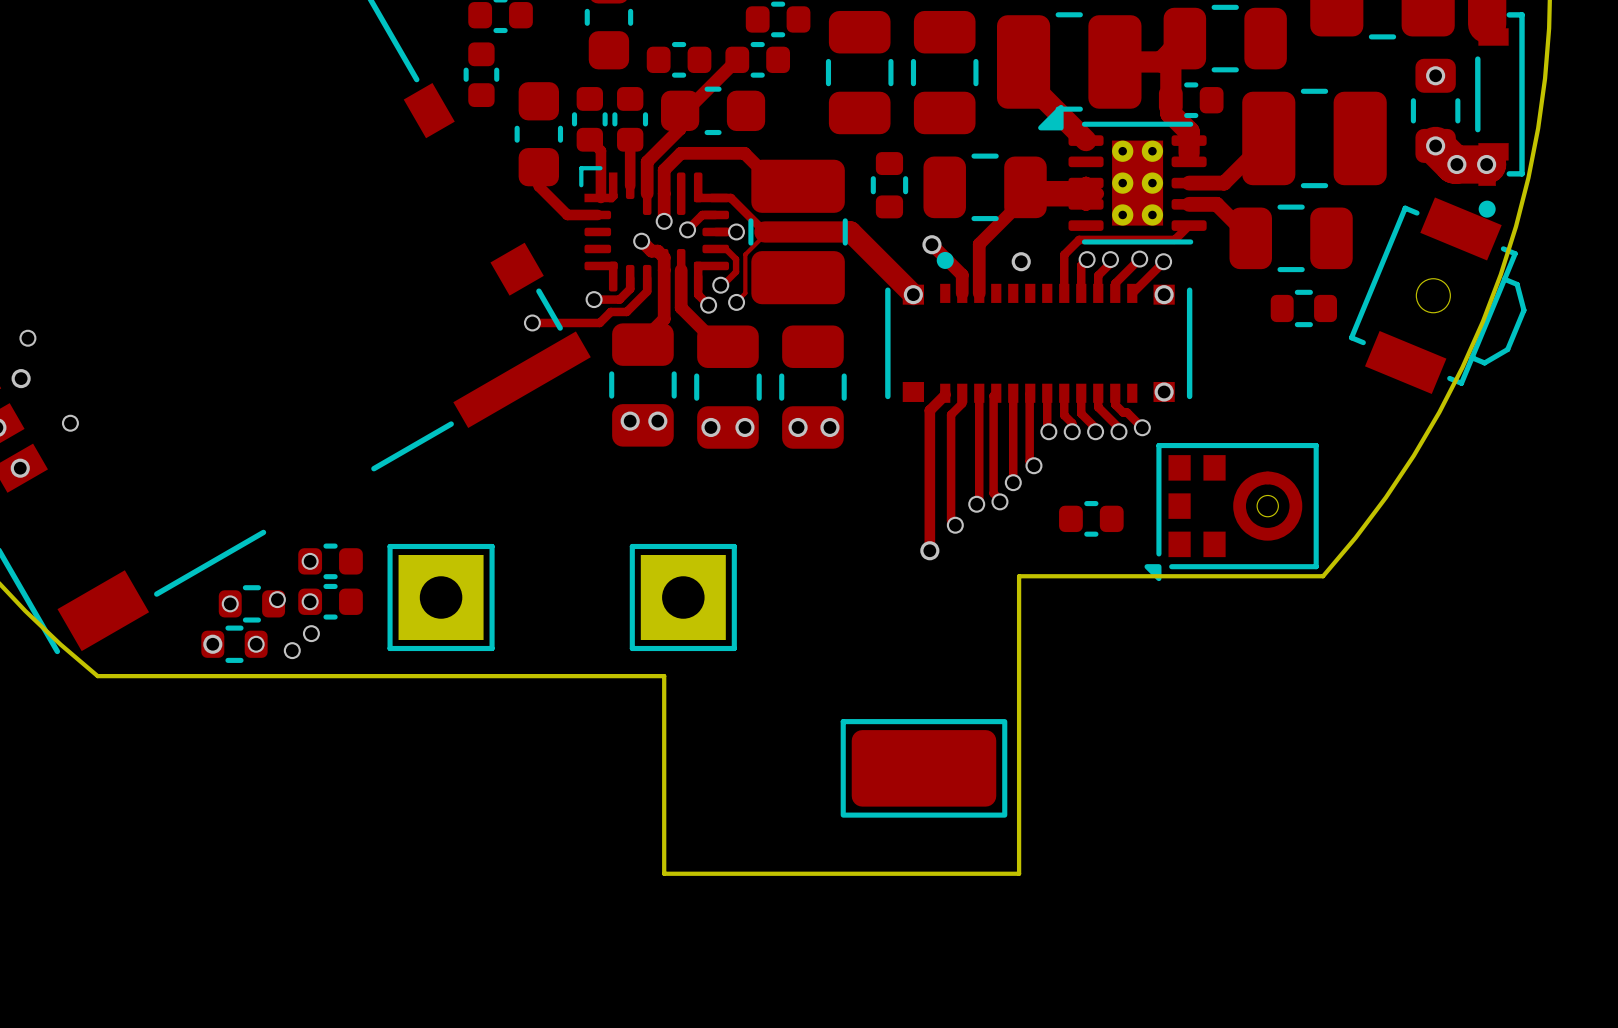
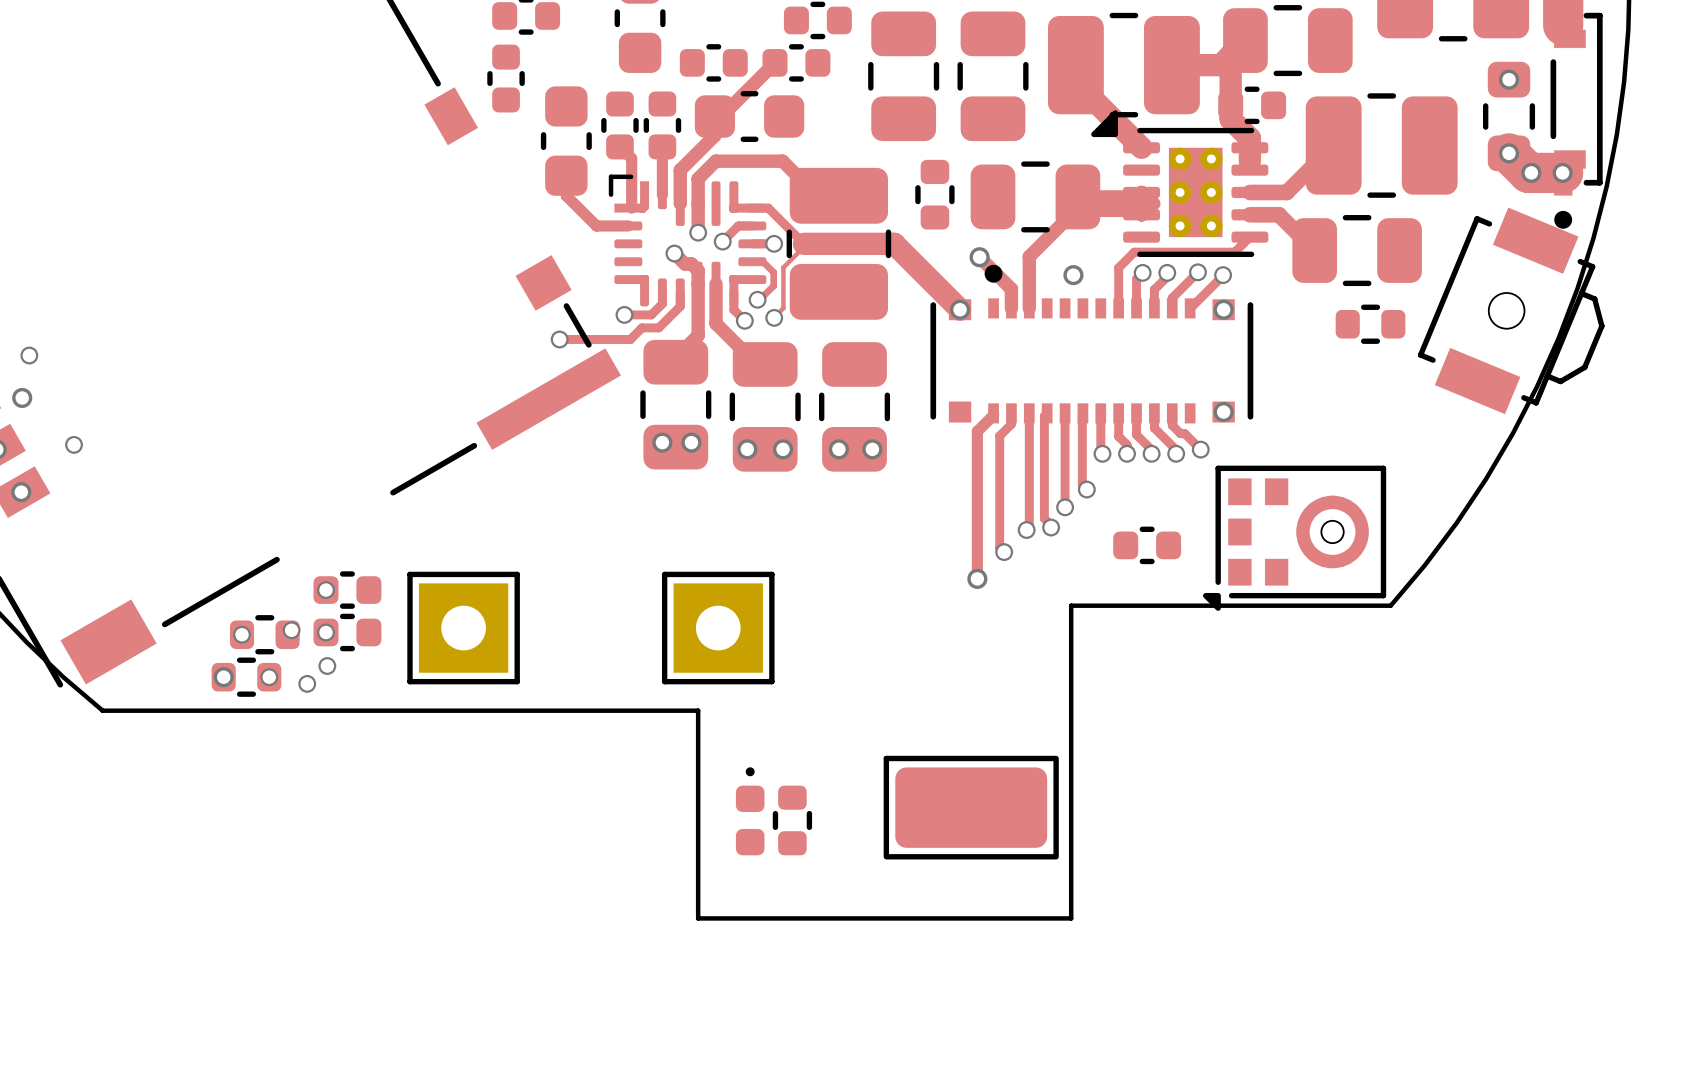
part: none -> (750, 811)
part: none -> (792, 820)

